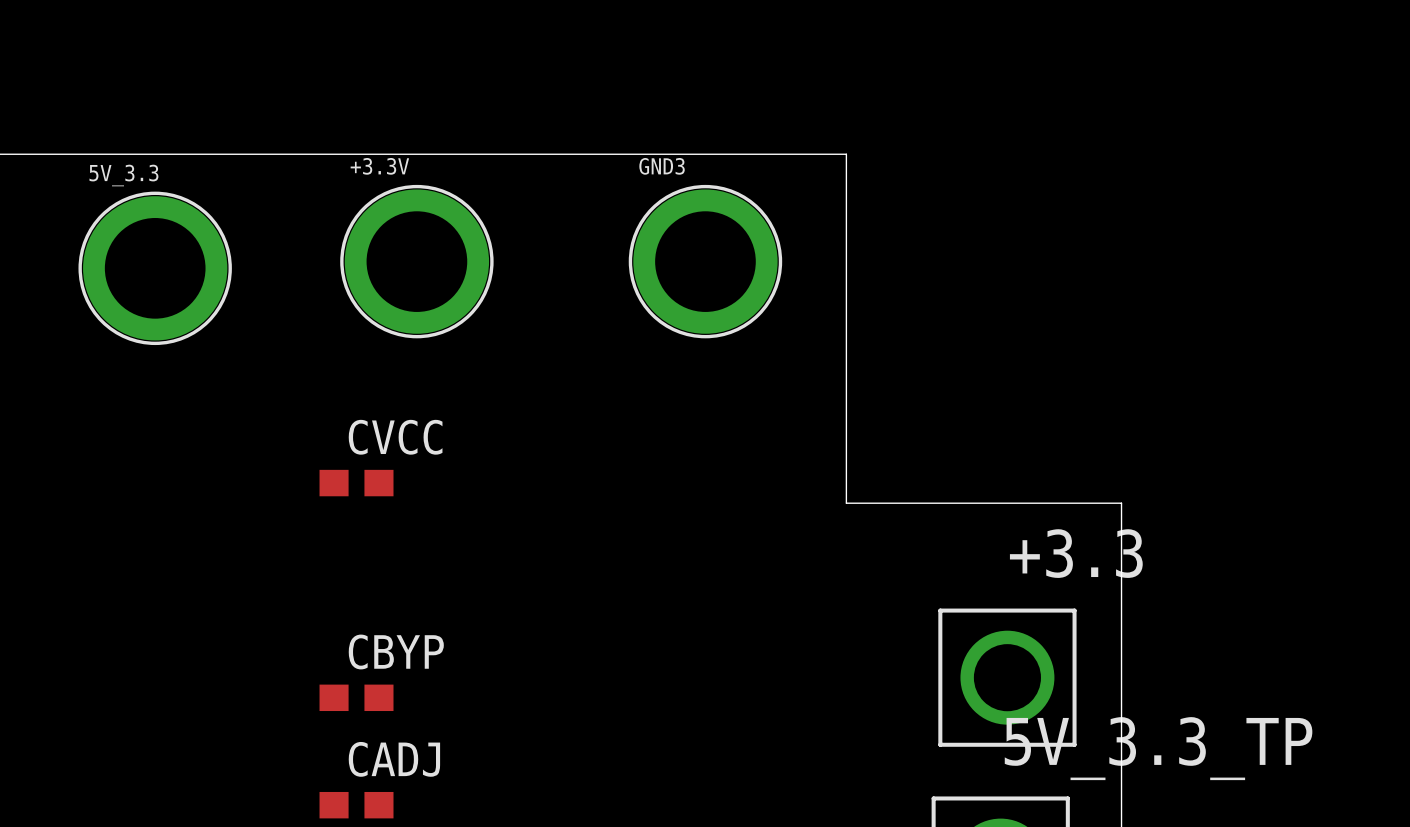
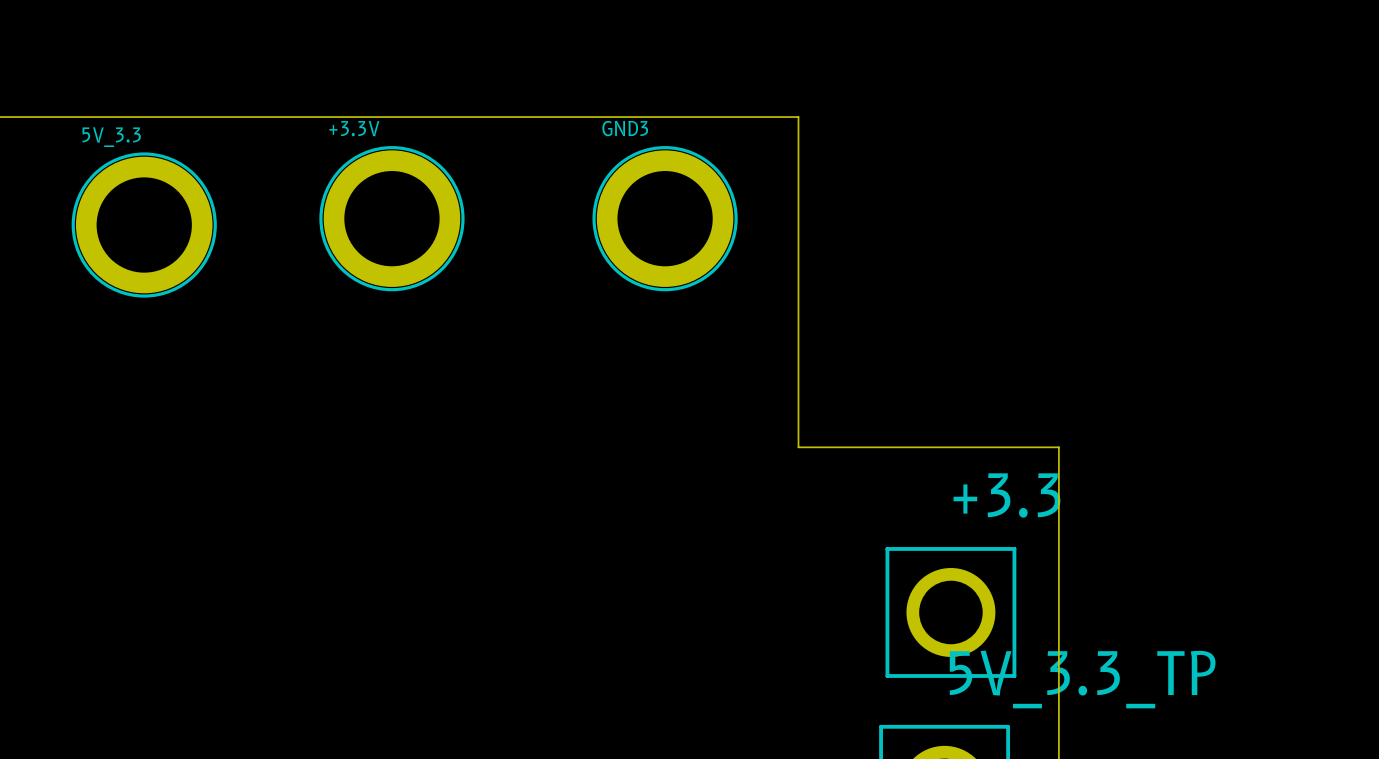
CVCC: (356, 483) -> none
CBYP: (356, 697) -> none
CADJ: (356, 805) -> none

